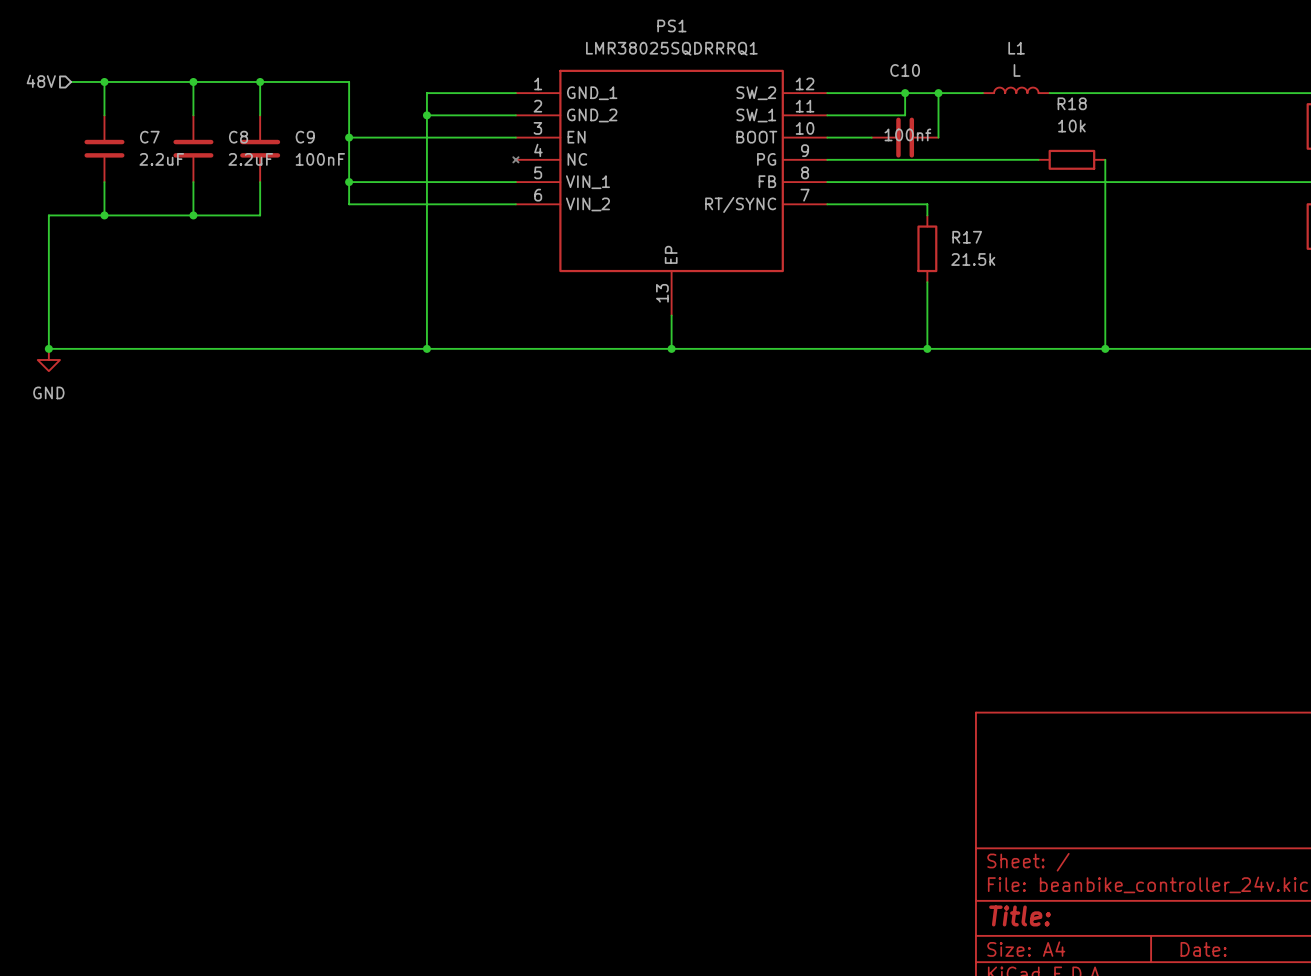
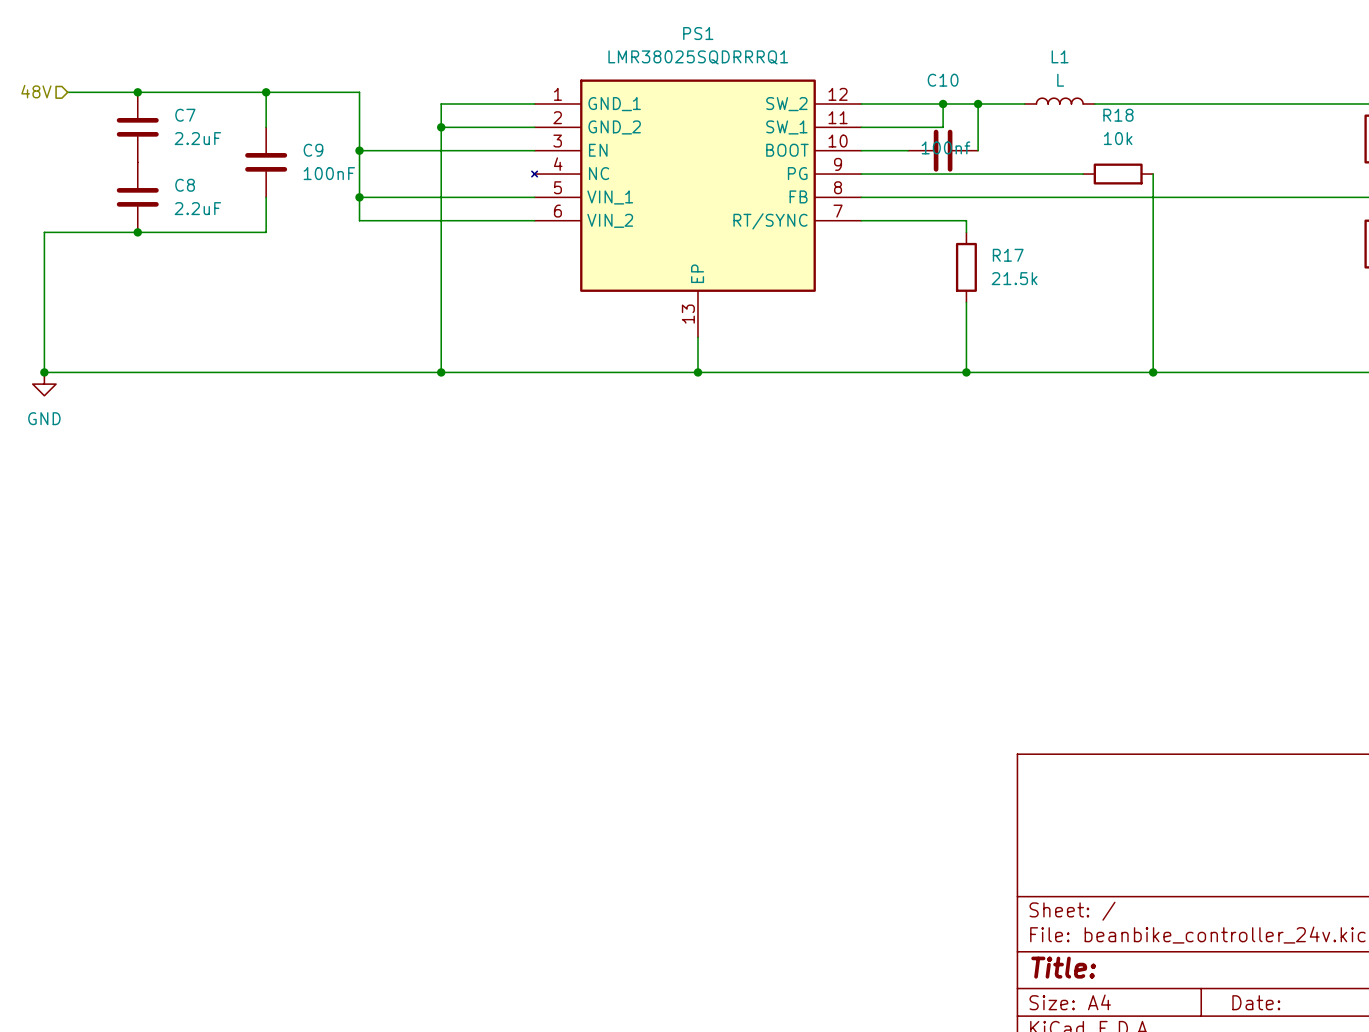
wire: (104, 81) (104, 115) -> none
junction: (104, 81) -> none
junction: none -> (137, 92)
wire: (193, 81) (193, 115) -> none
junction: (193, 81) -> none
C7 position: (104, 148) -> (137, 127)
C8 position: (193, 148) -> (137, 197)
wire: (104, 182) (104, 215) -> none
wire: (193, 182) (193, 215) -> none
junction: (104, 215) -> none
junction: none -> (137, 232)
junction: (193, 215) -> none

